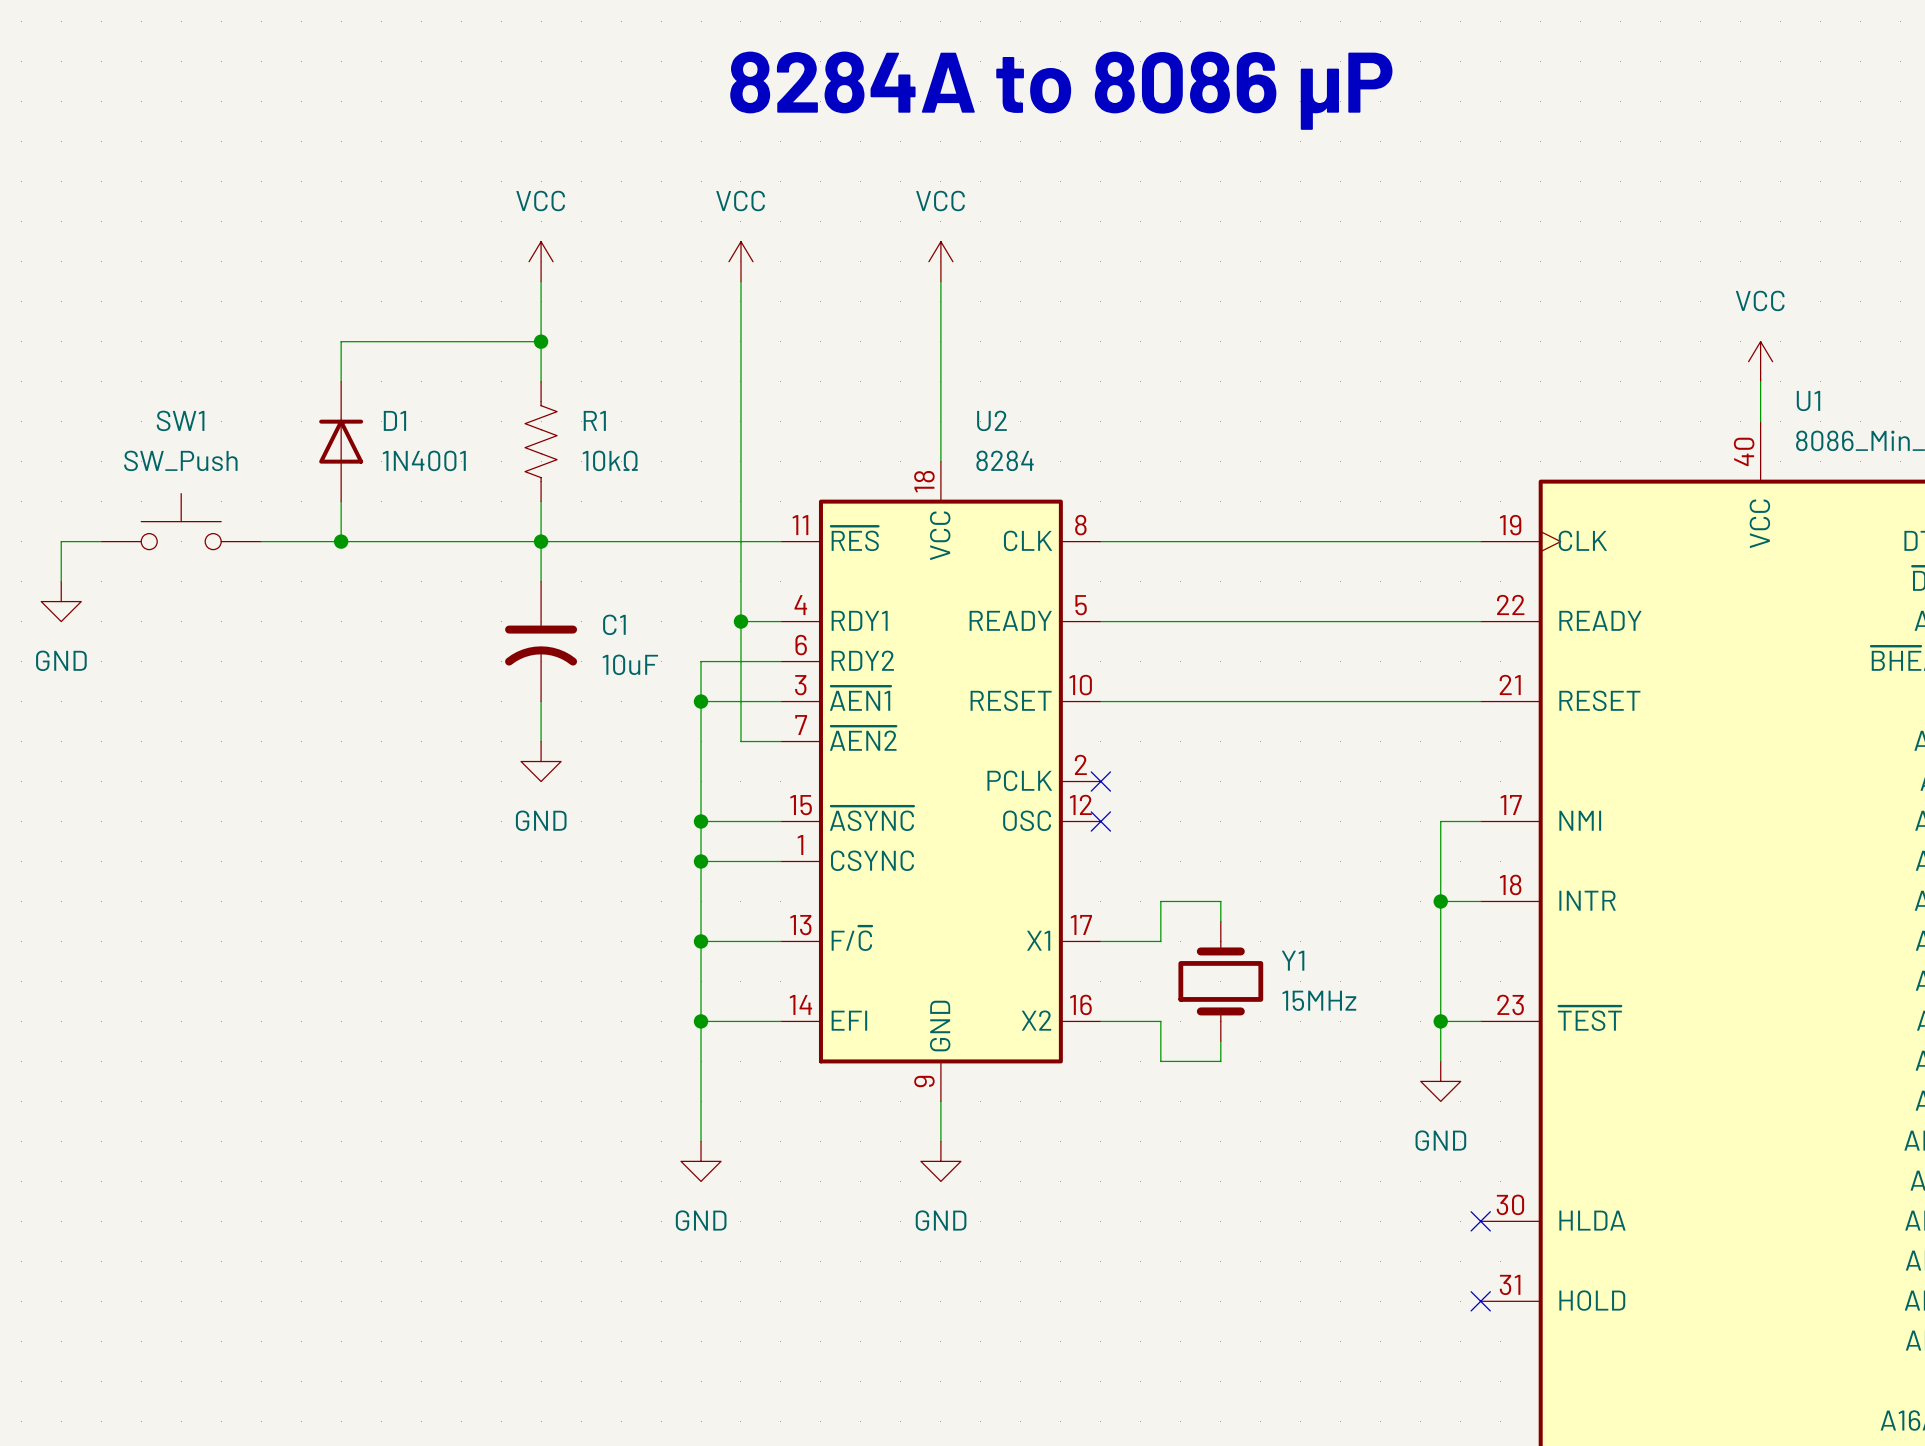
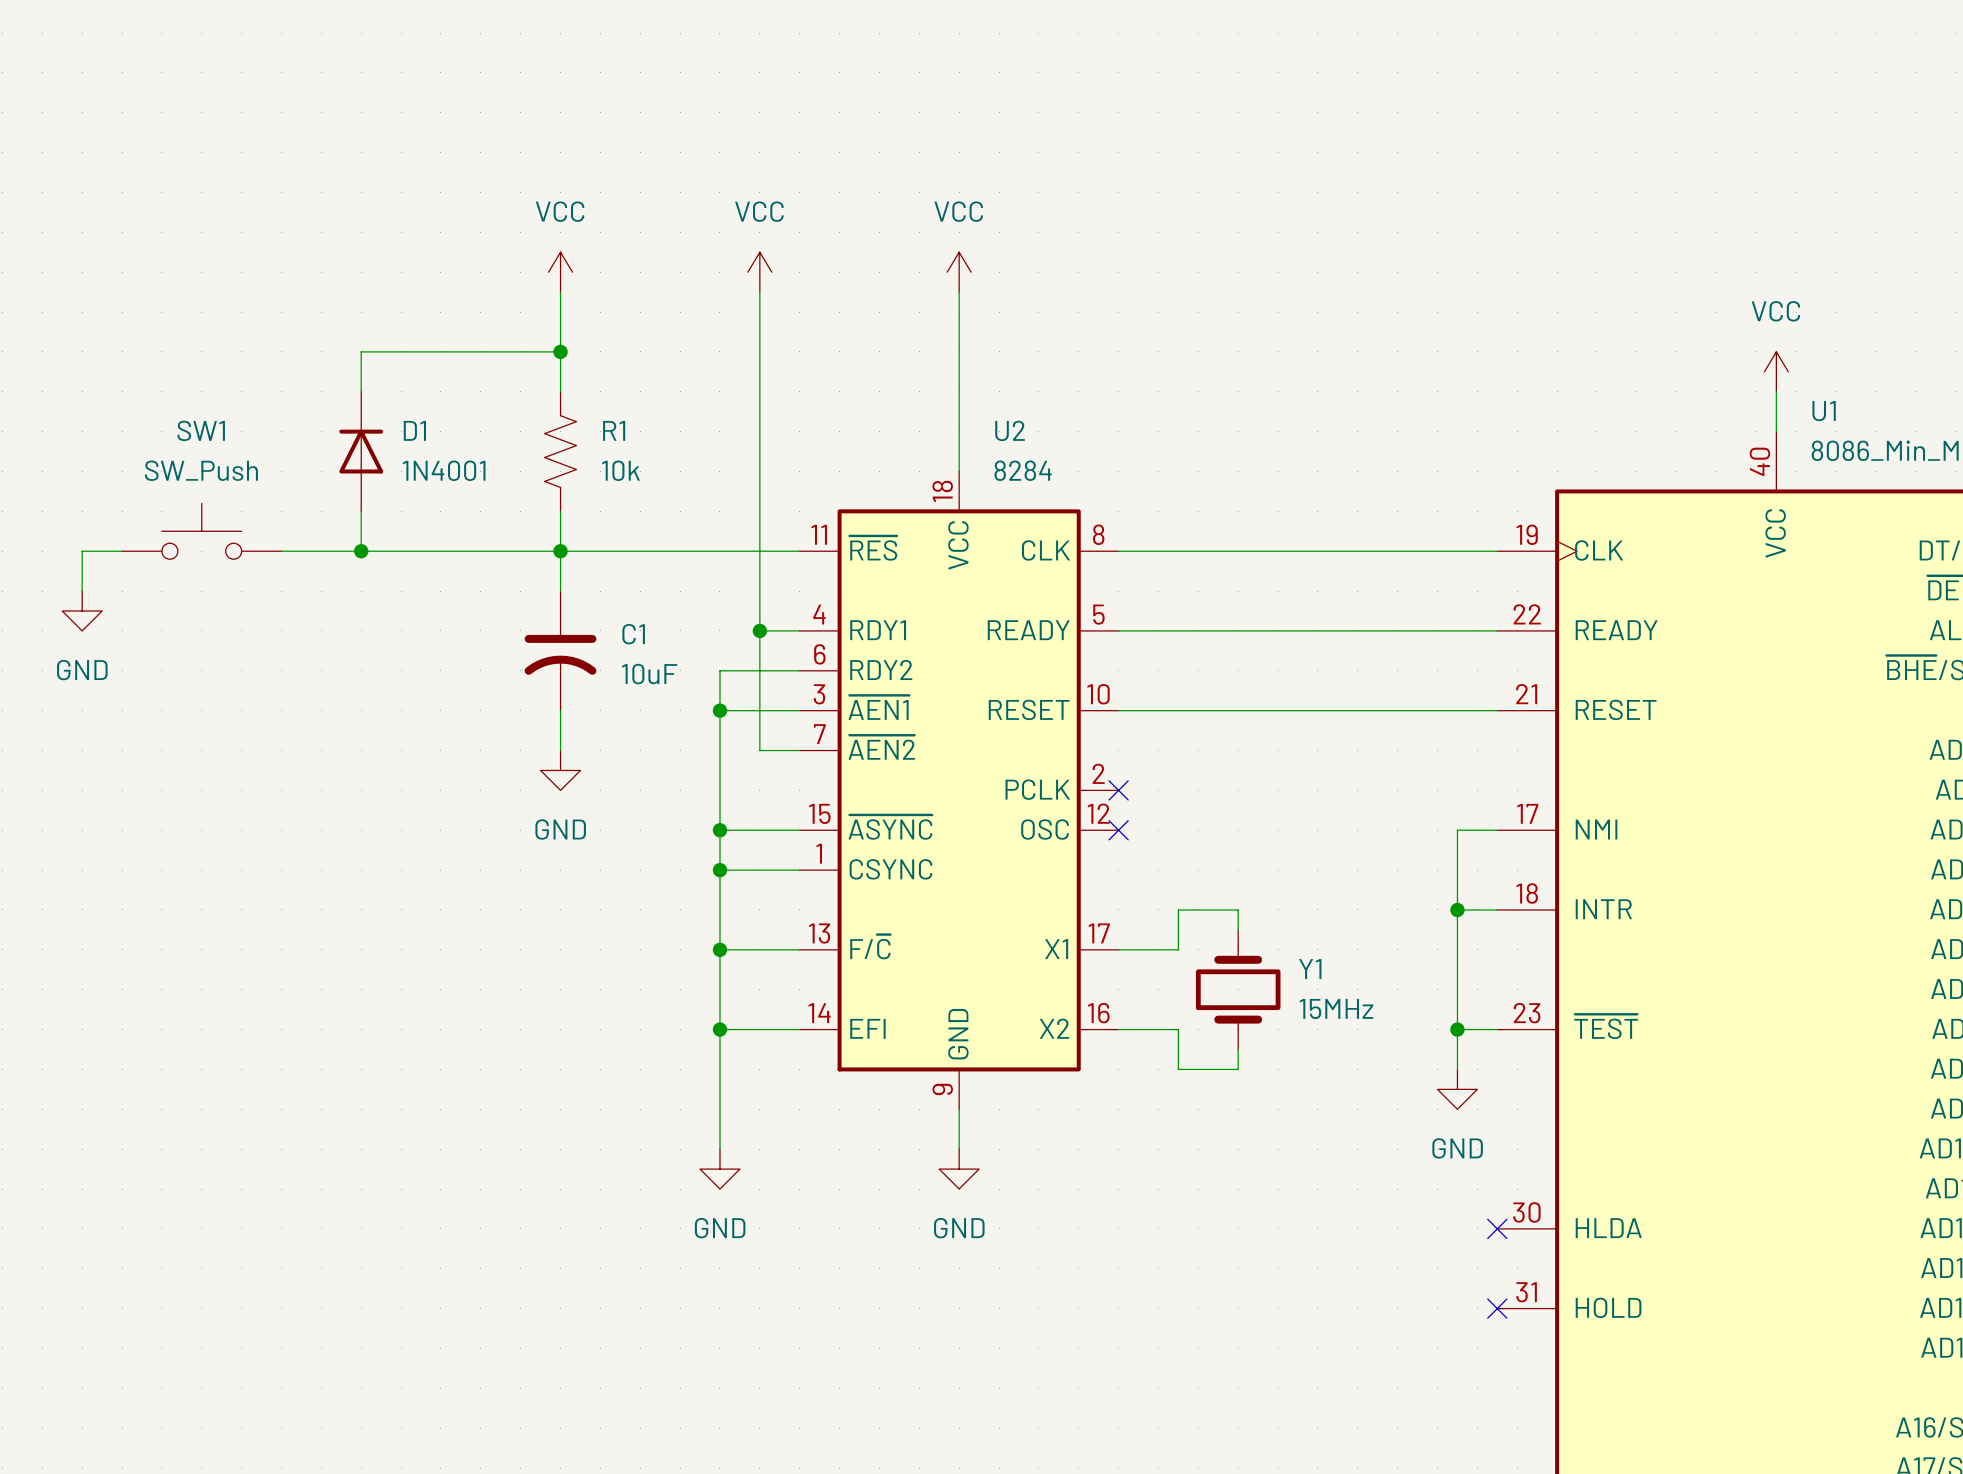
text: 8284A to 8086 µP (1061, 90) -> none
R1 value: 10kΩ (610, 460) -> 10k (620, 470)

